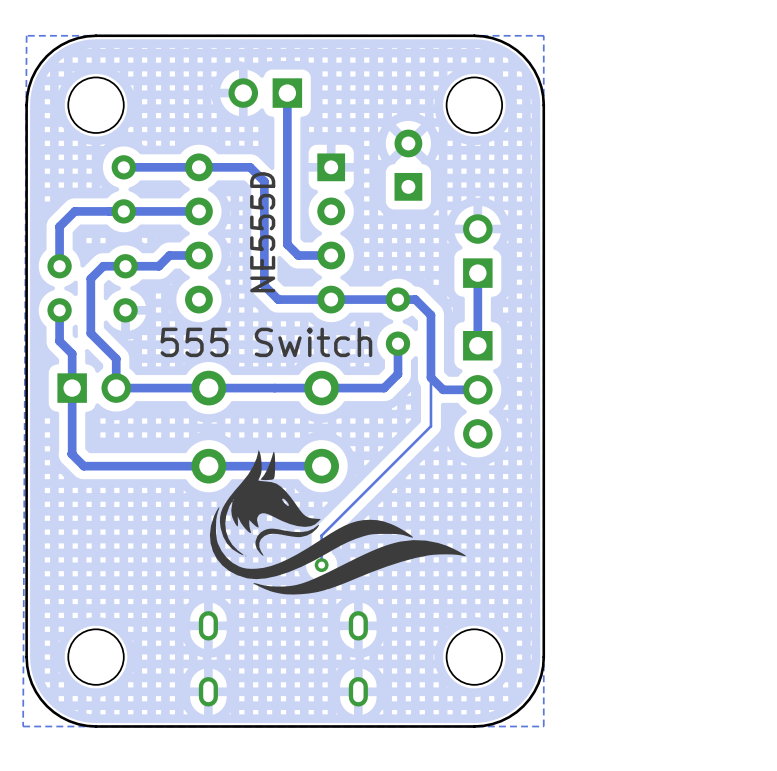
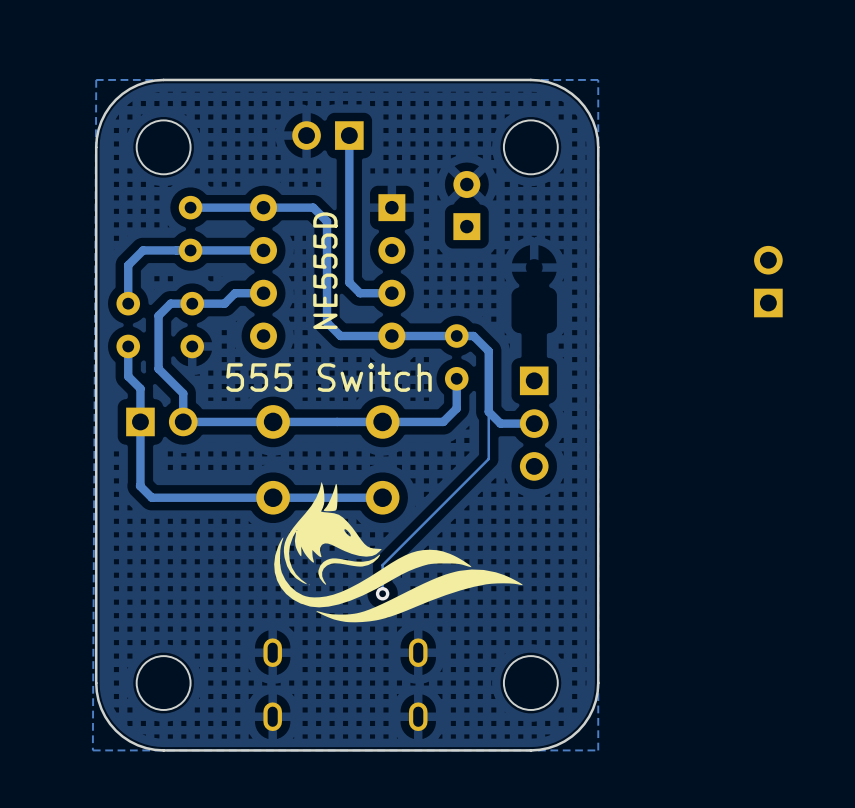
part position: (477, 251) -> (768, 281)
track: (477, 273) (477, 345) -> none

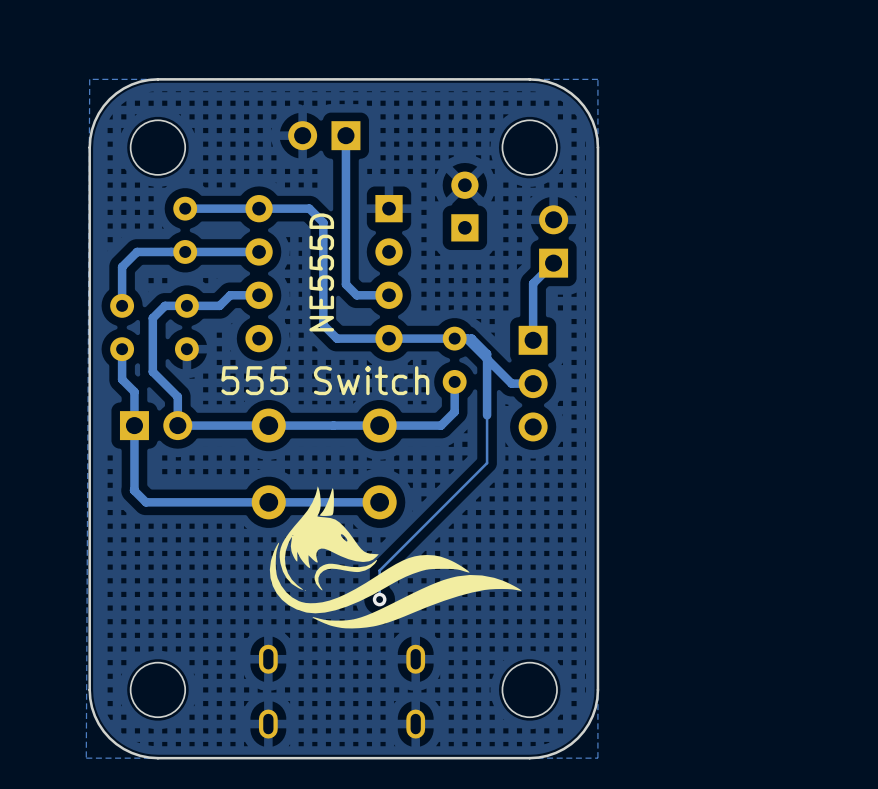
track: none -> (553, 263) (533, 283) (533, 340)
part position: (768, 281) -> (553, 241)
track: none -> (466, 338) (511, 383) (533, 383)
track: (488, 411) (500, 423) (534, 423) -> none
part position: (534, 423) -> (533, 383)

